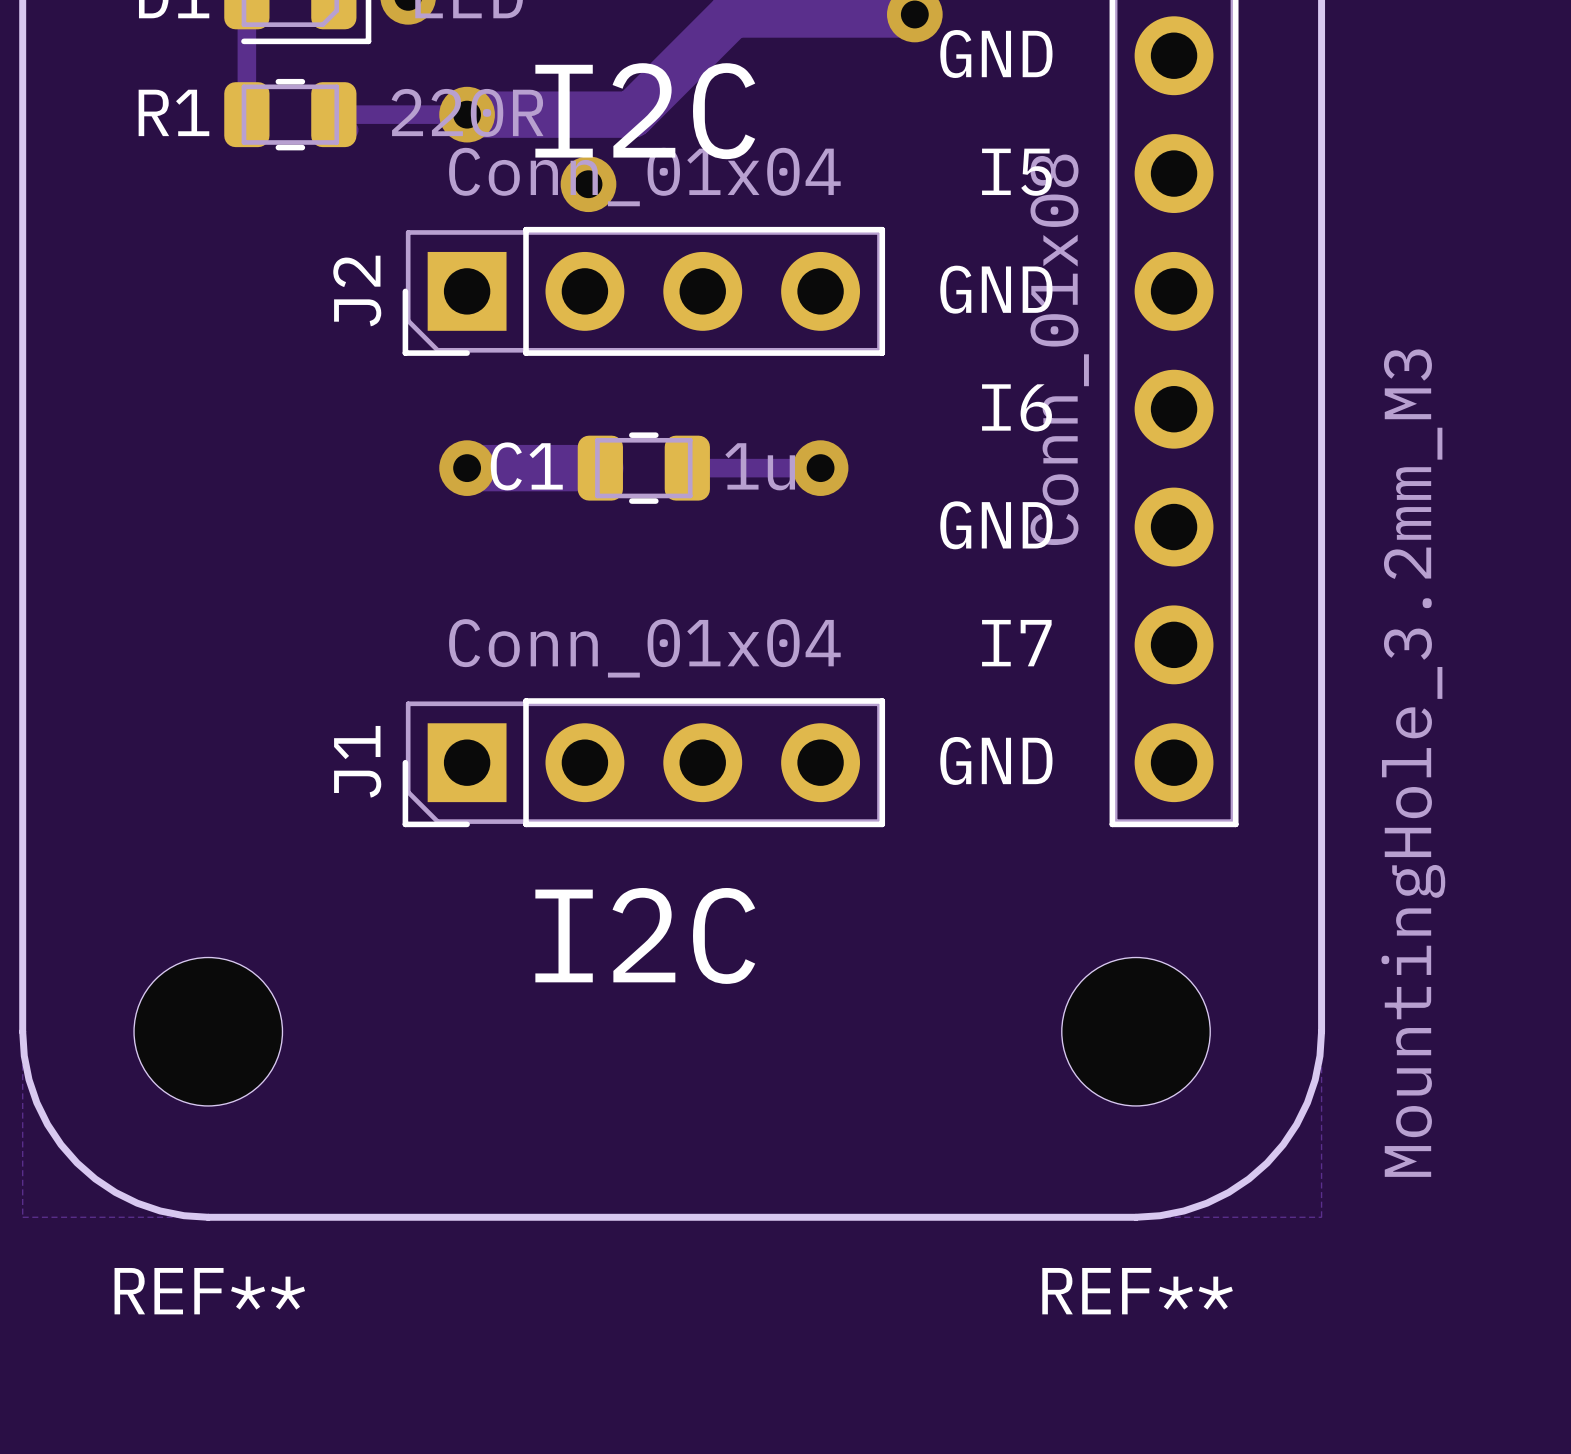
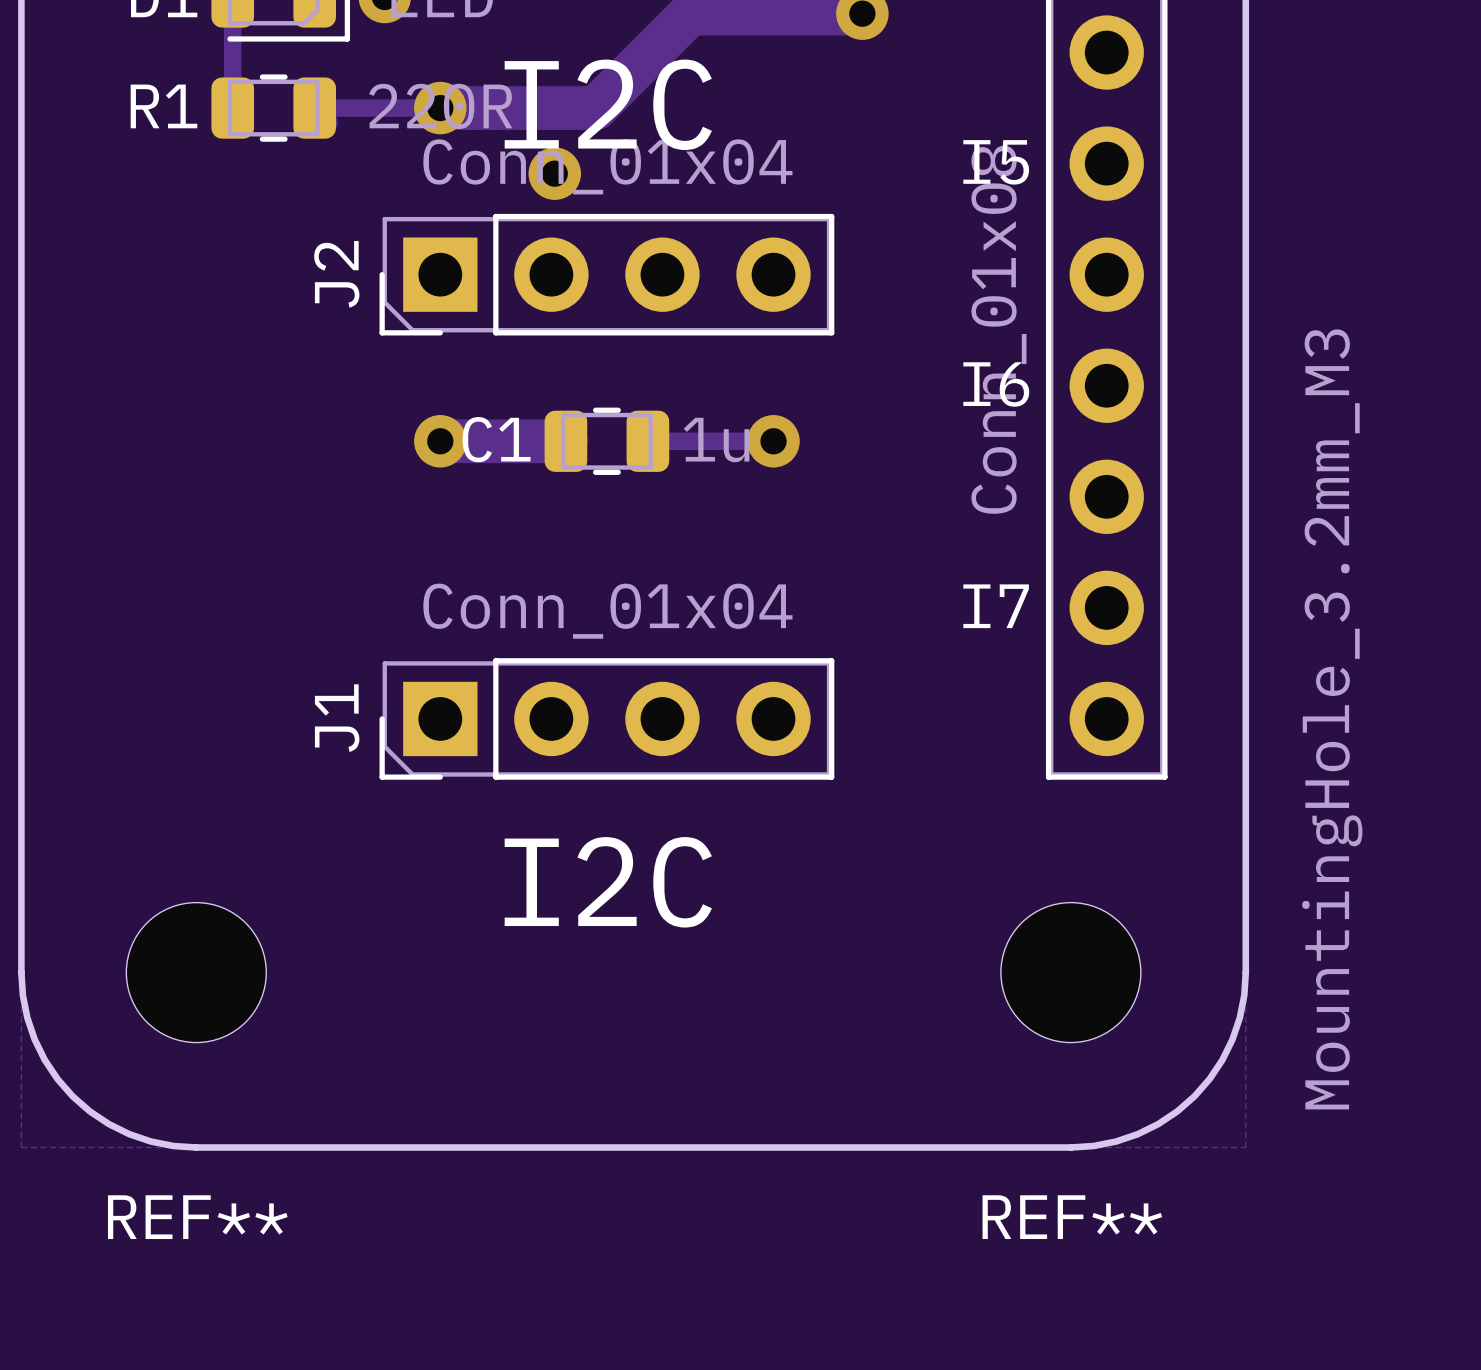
text: GND (996, 54) -> none
text position: I5 (1016, 172) -> I5 (996, 162)
text: GND (996, 289) -> none
text position: I6 (1017, 407) -> I6 (996, 384)
text: GND (996, 525) -> none
text position: I7 (1016, 643) -> I7 (996, 606)
text: GND (996, 760) -> none

